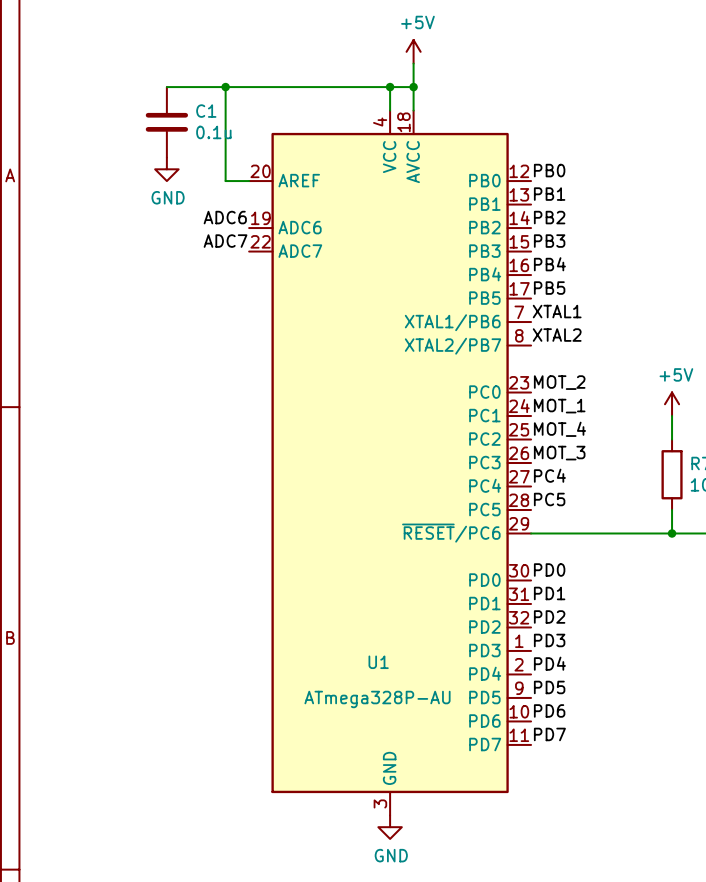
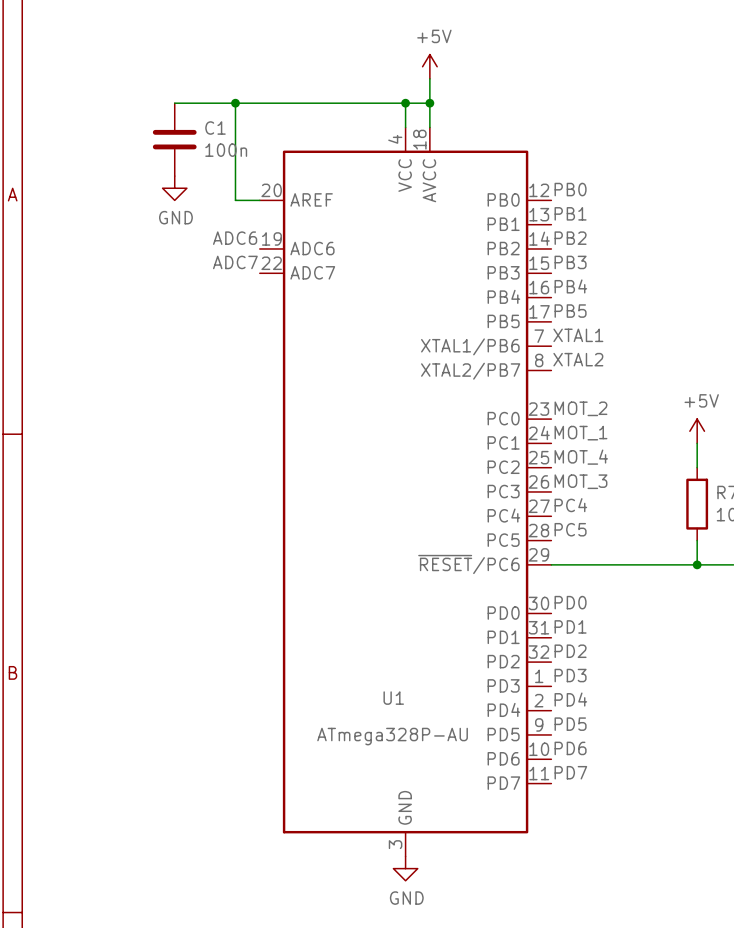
C1 value: 0.1u (213, 132) -> 100n (226, 150)

